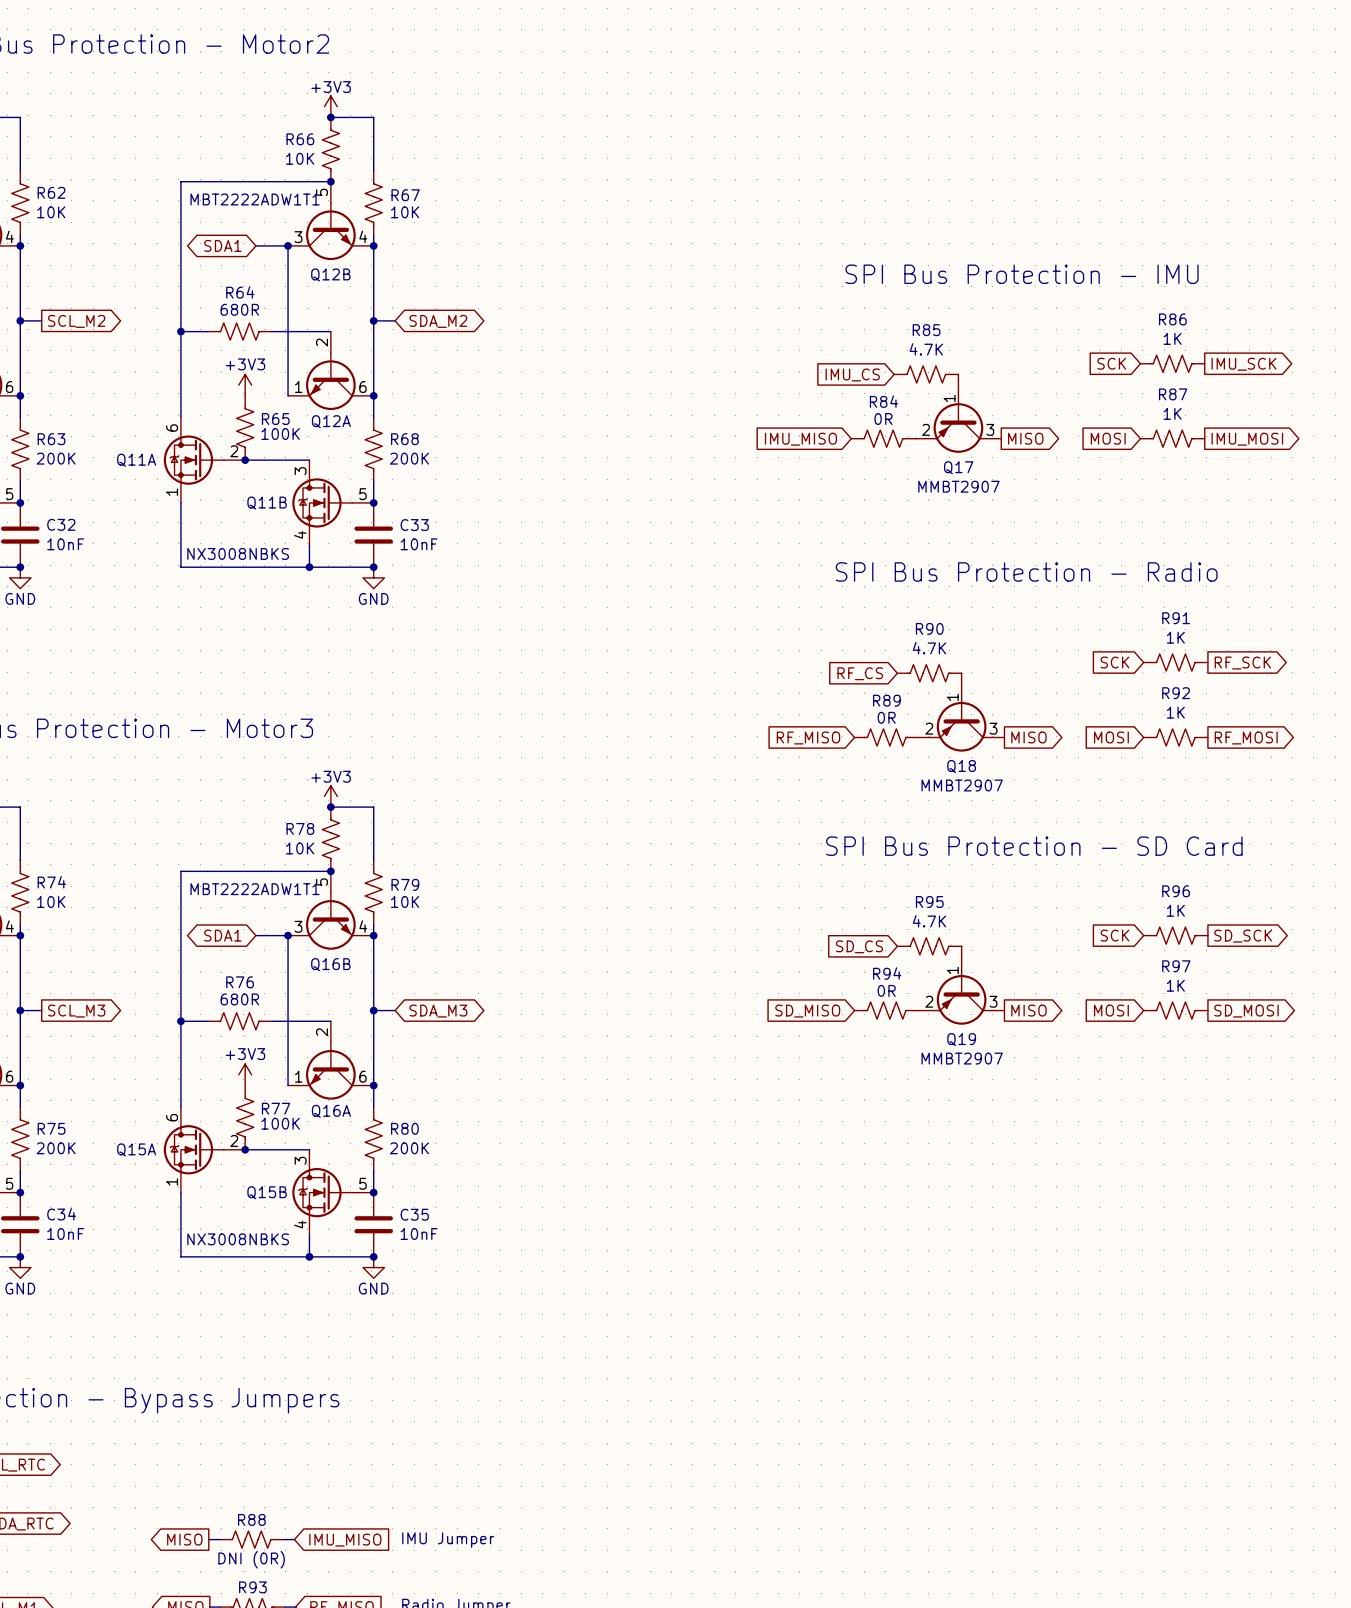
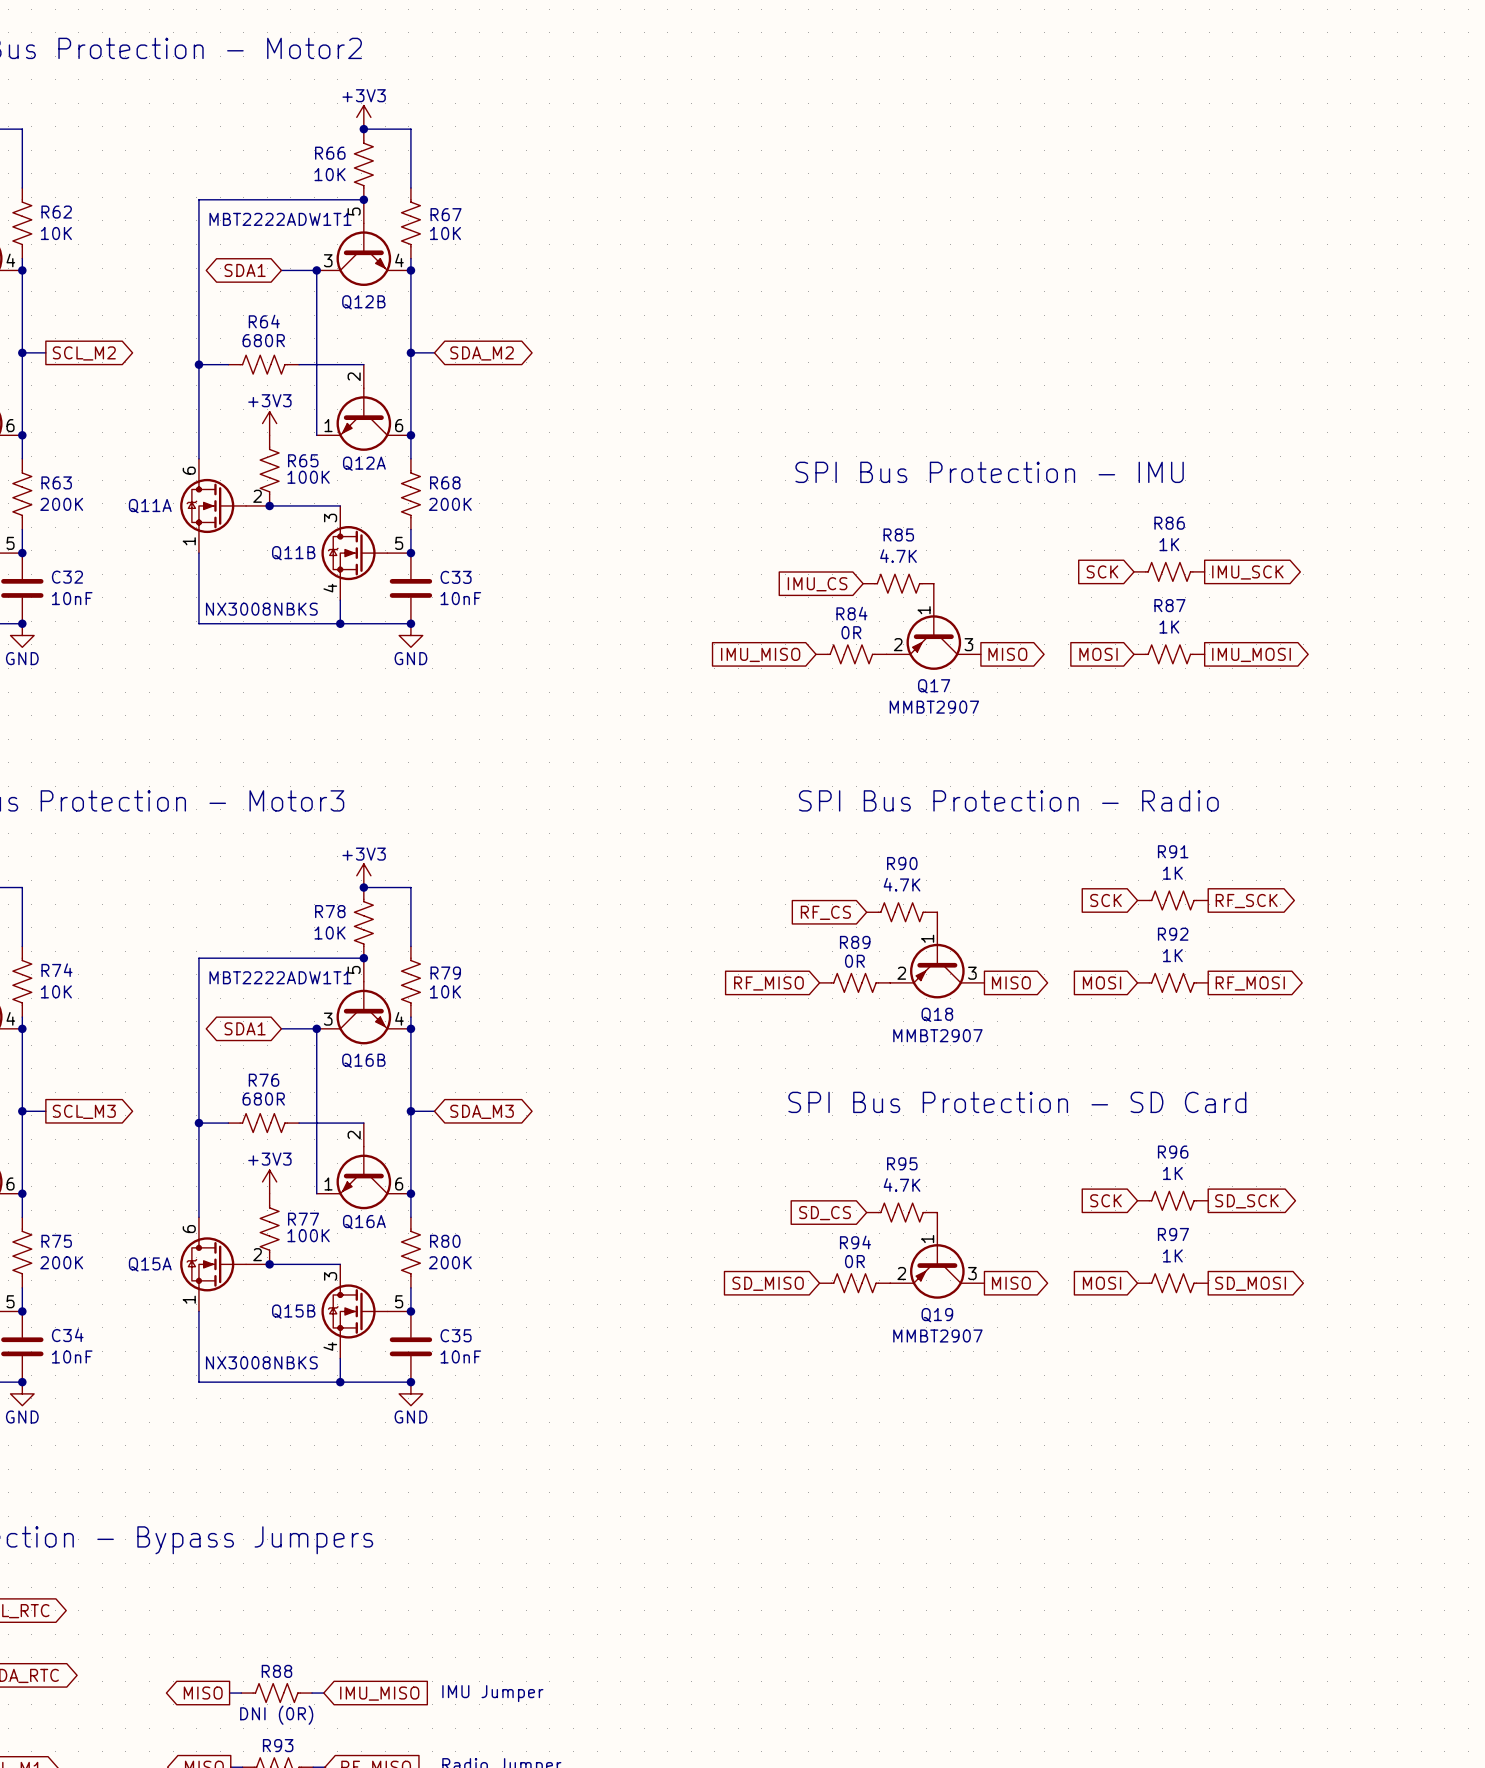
text position: SPI Bus Protection - IMU (1021, 274) -> SPI Bus Protection - IMU (989, 472)
global label: SCK (1111, 363) -> none
R86 position: (1172, 363) -> (1169, 571)
global label position: IMU_SCK (1244, 364) -> IMU_SCK (1247, 572)
global label position: IMU_CS (852, 374) -> IMU_CS (817, 584)
R85 position: (926, 374) -> (898, 583)
Q17 position: (958, 413) -> (933, 626)
R84 position: (883, 438) -> (851, 654)
global label: MISO (1025, 438) -> none
global label: MOSI (1108, 438) -> none
R87 position: (1172, 438) -> (1169, 654)
global label position: IMU_MISO (800, 439) -> IMU_MISO (760, 654)
global label position: IMU_MOSI (1247, 439) -> IMU_MOSI (1251, 654)
global label: none -> SCK (1102, 571)
text position: SPI Bus Protection - Radio (1026, 571) -> SPI Bus Protection - Radio (1008, 800)
global label: none -> MISO (1007, 654)
global label: none -> MOSI (1098, 654)
global label: SCK (1114, 662) -> none
R91 position: (1175, 662) -> (1172, 900)
global label position: RF_SCK (1242, 663) -> RF_SCK (1246, 901)
global label position: RF_CS (860, 673) -> RF_CS (825, 912)
R90 position: (929, 673) -> (902, 912)
Q18 position: (961, 712) -> (937, 955)
global label position: RF_MISO (808, 737) -> RF_MISO (768, 983)
R89 position: (886, 737) -> (854, 982)
global label: MISO (1028, 737) -> none
global label: MOSI (1111, 737) -> none
R92 position: (1175, 737) -> (1172, 982)
global label position: RF_MOSI (1246, 737) -> RF_MOSI (1250, 983)
global label: none -> SCK (1105, 900)
text position: SPI Bus Protection - SD Card (1034, 846) -> SPI Bus Protection - SD Card (1017, 1102)
global label: none -> MISO (1011, 982)
global label: none -> MOSI (1102, 982)
global label: SCK (1114, 935) -> none
R96 position: (1175, 935) -> (1172, 1200)
global label position: SD_SCK (1243, 936) -> SD_SCK (1246, 1201)
global label position: SD_CS (859, 946) -> SD_CS (825, 1213)
R95 position: (929, 946) -> (902, 1212)
Q19 position: (961, 985) -> (937, 1255)
R94 position: (886, 1010) -> (854, 1283)
global label: MISO (1028, 1010) -> none
global label: MOSI (1111, 1010) -> none
R97 position: (1175, 1010) -> (1172, 1283)
global label position: SD_MISO (807, 1011) -> SD_MISO (768, 1283)
global label position: SD_MOSI (1246, 1011) -> SD_MOSI (1250, 1283)
global label: none -> SCK (1105, 1200)
global label: none -> MISO (1011, 1283)
global label: none -> MOSI (1102, 1283)

